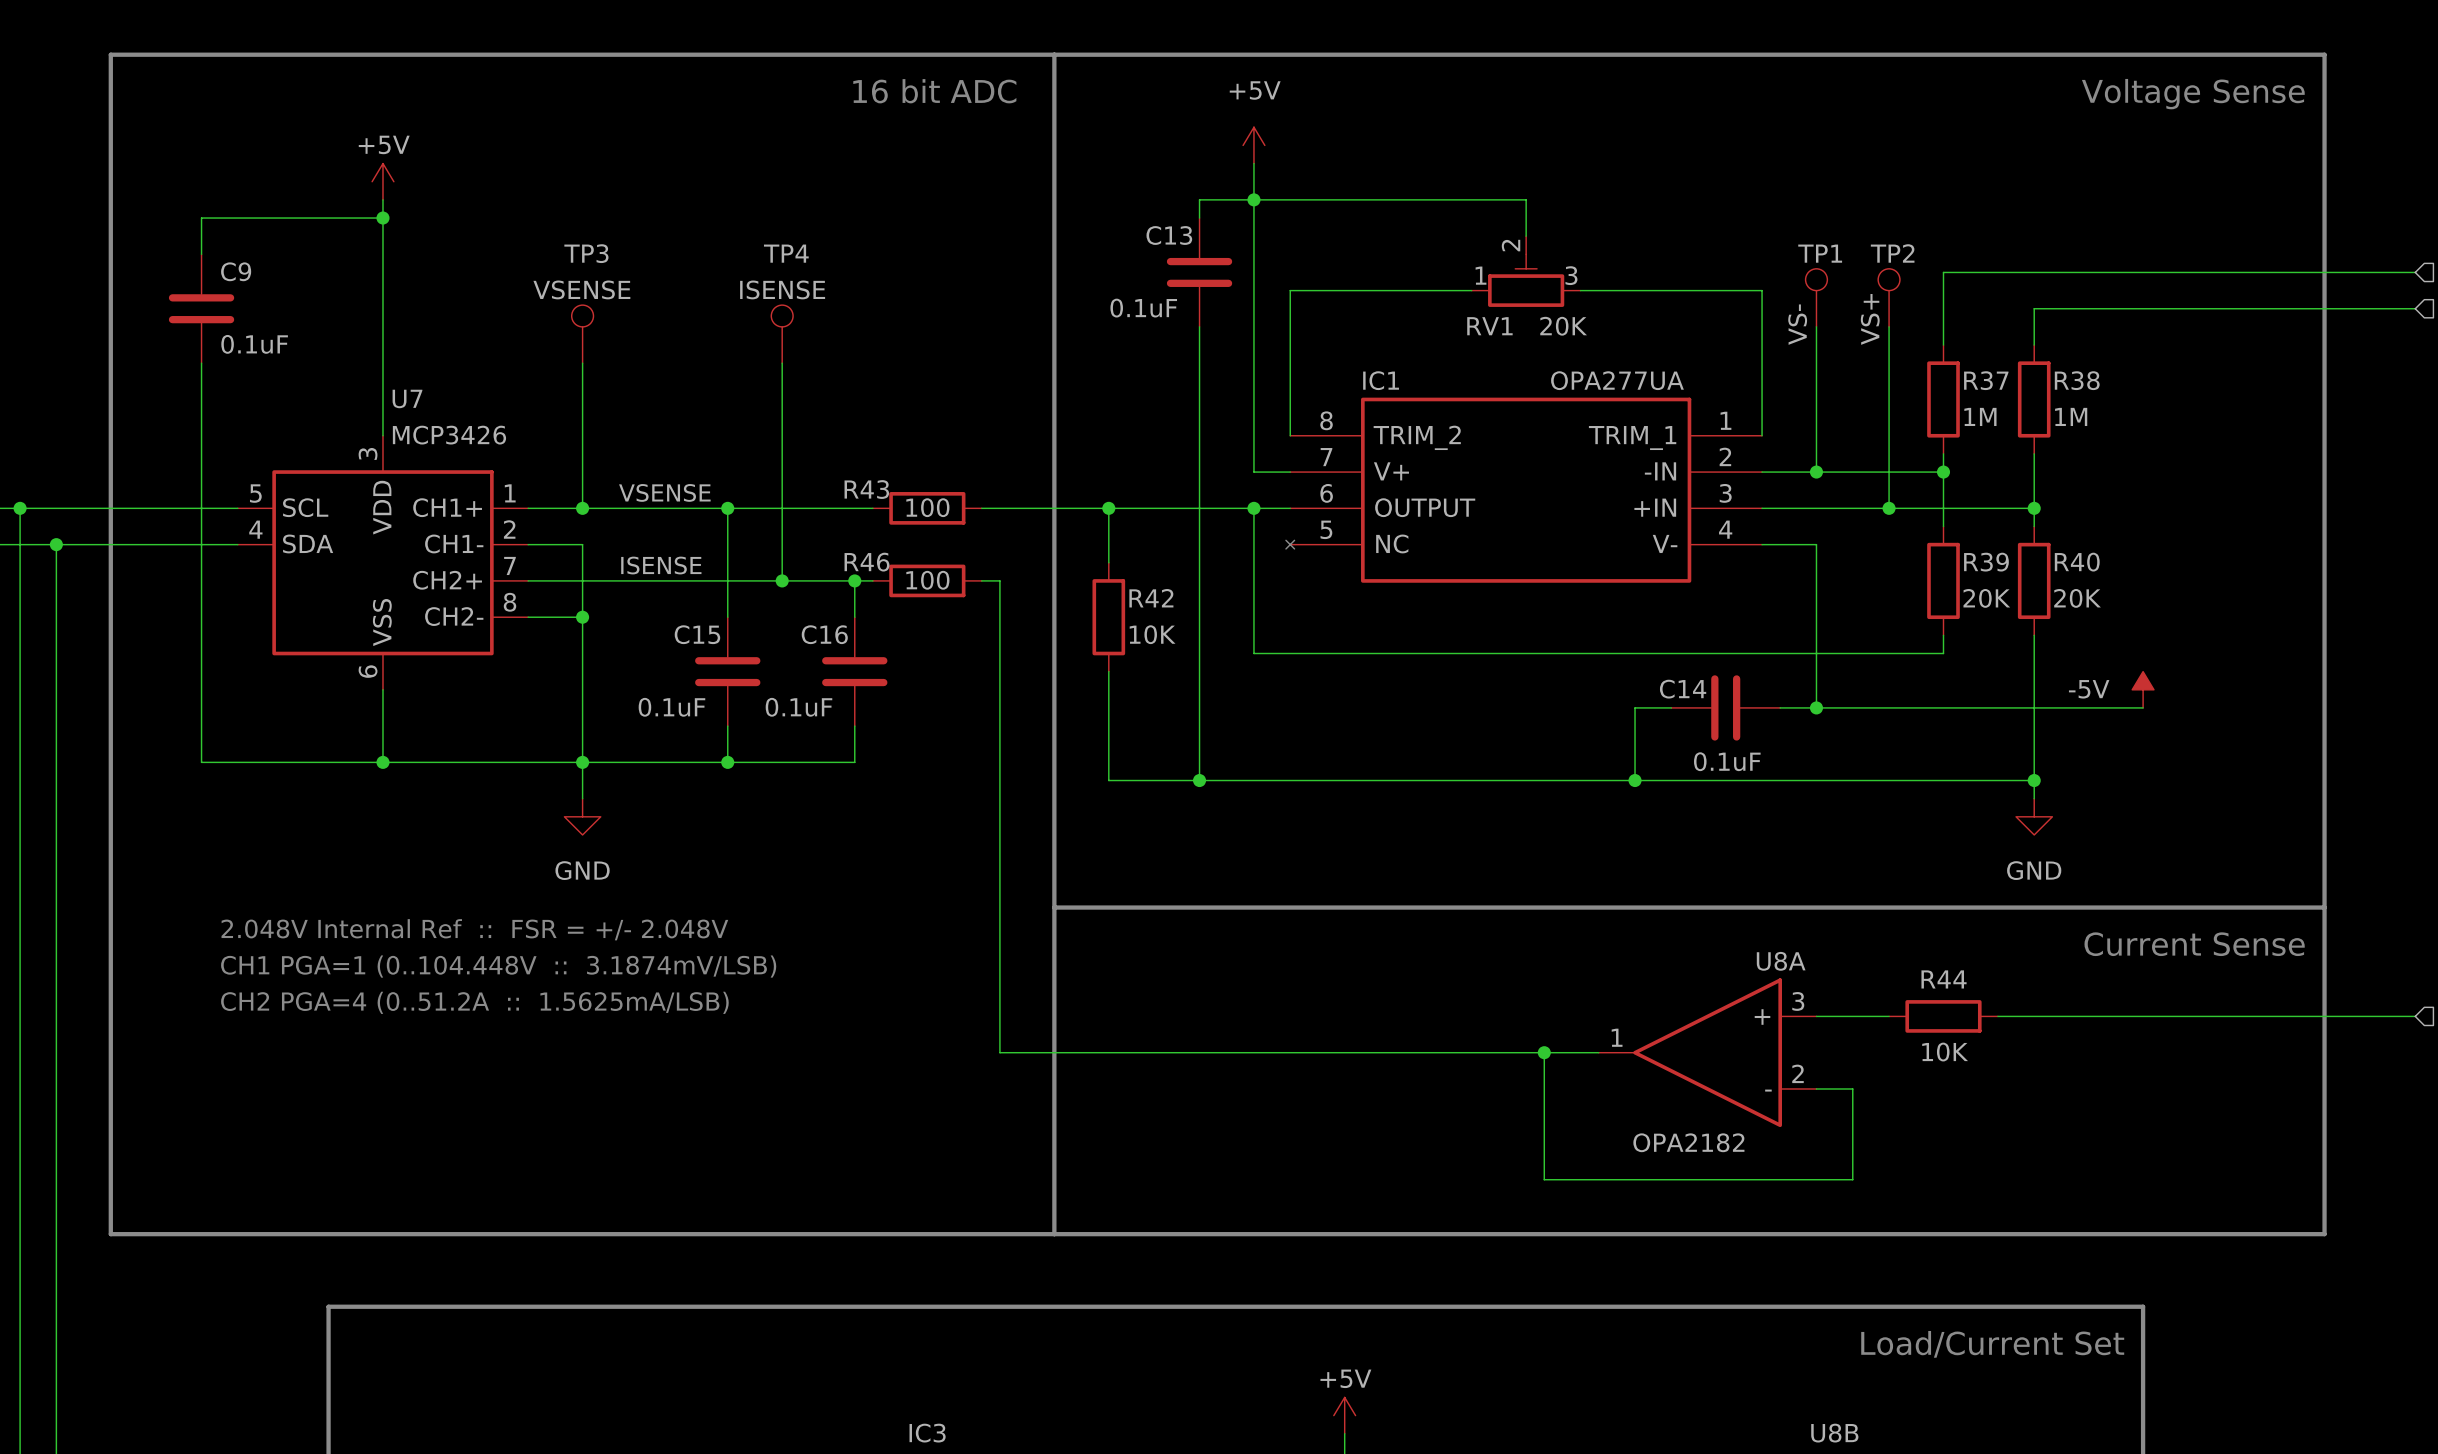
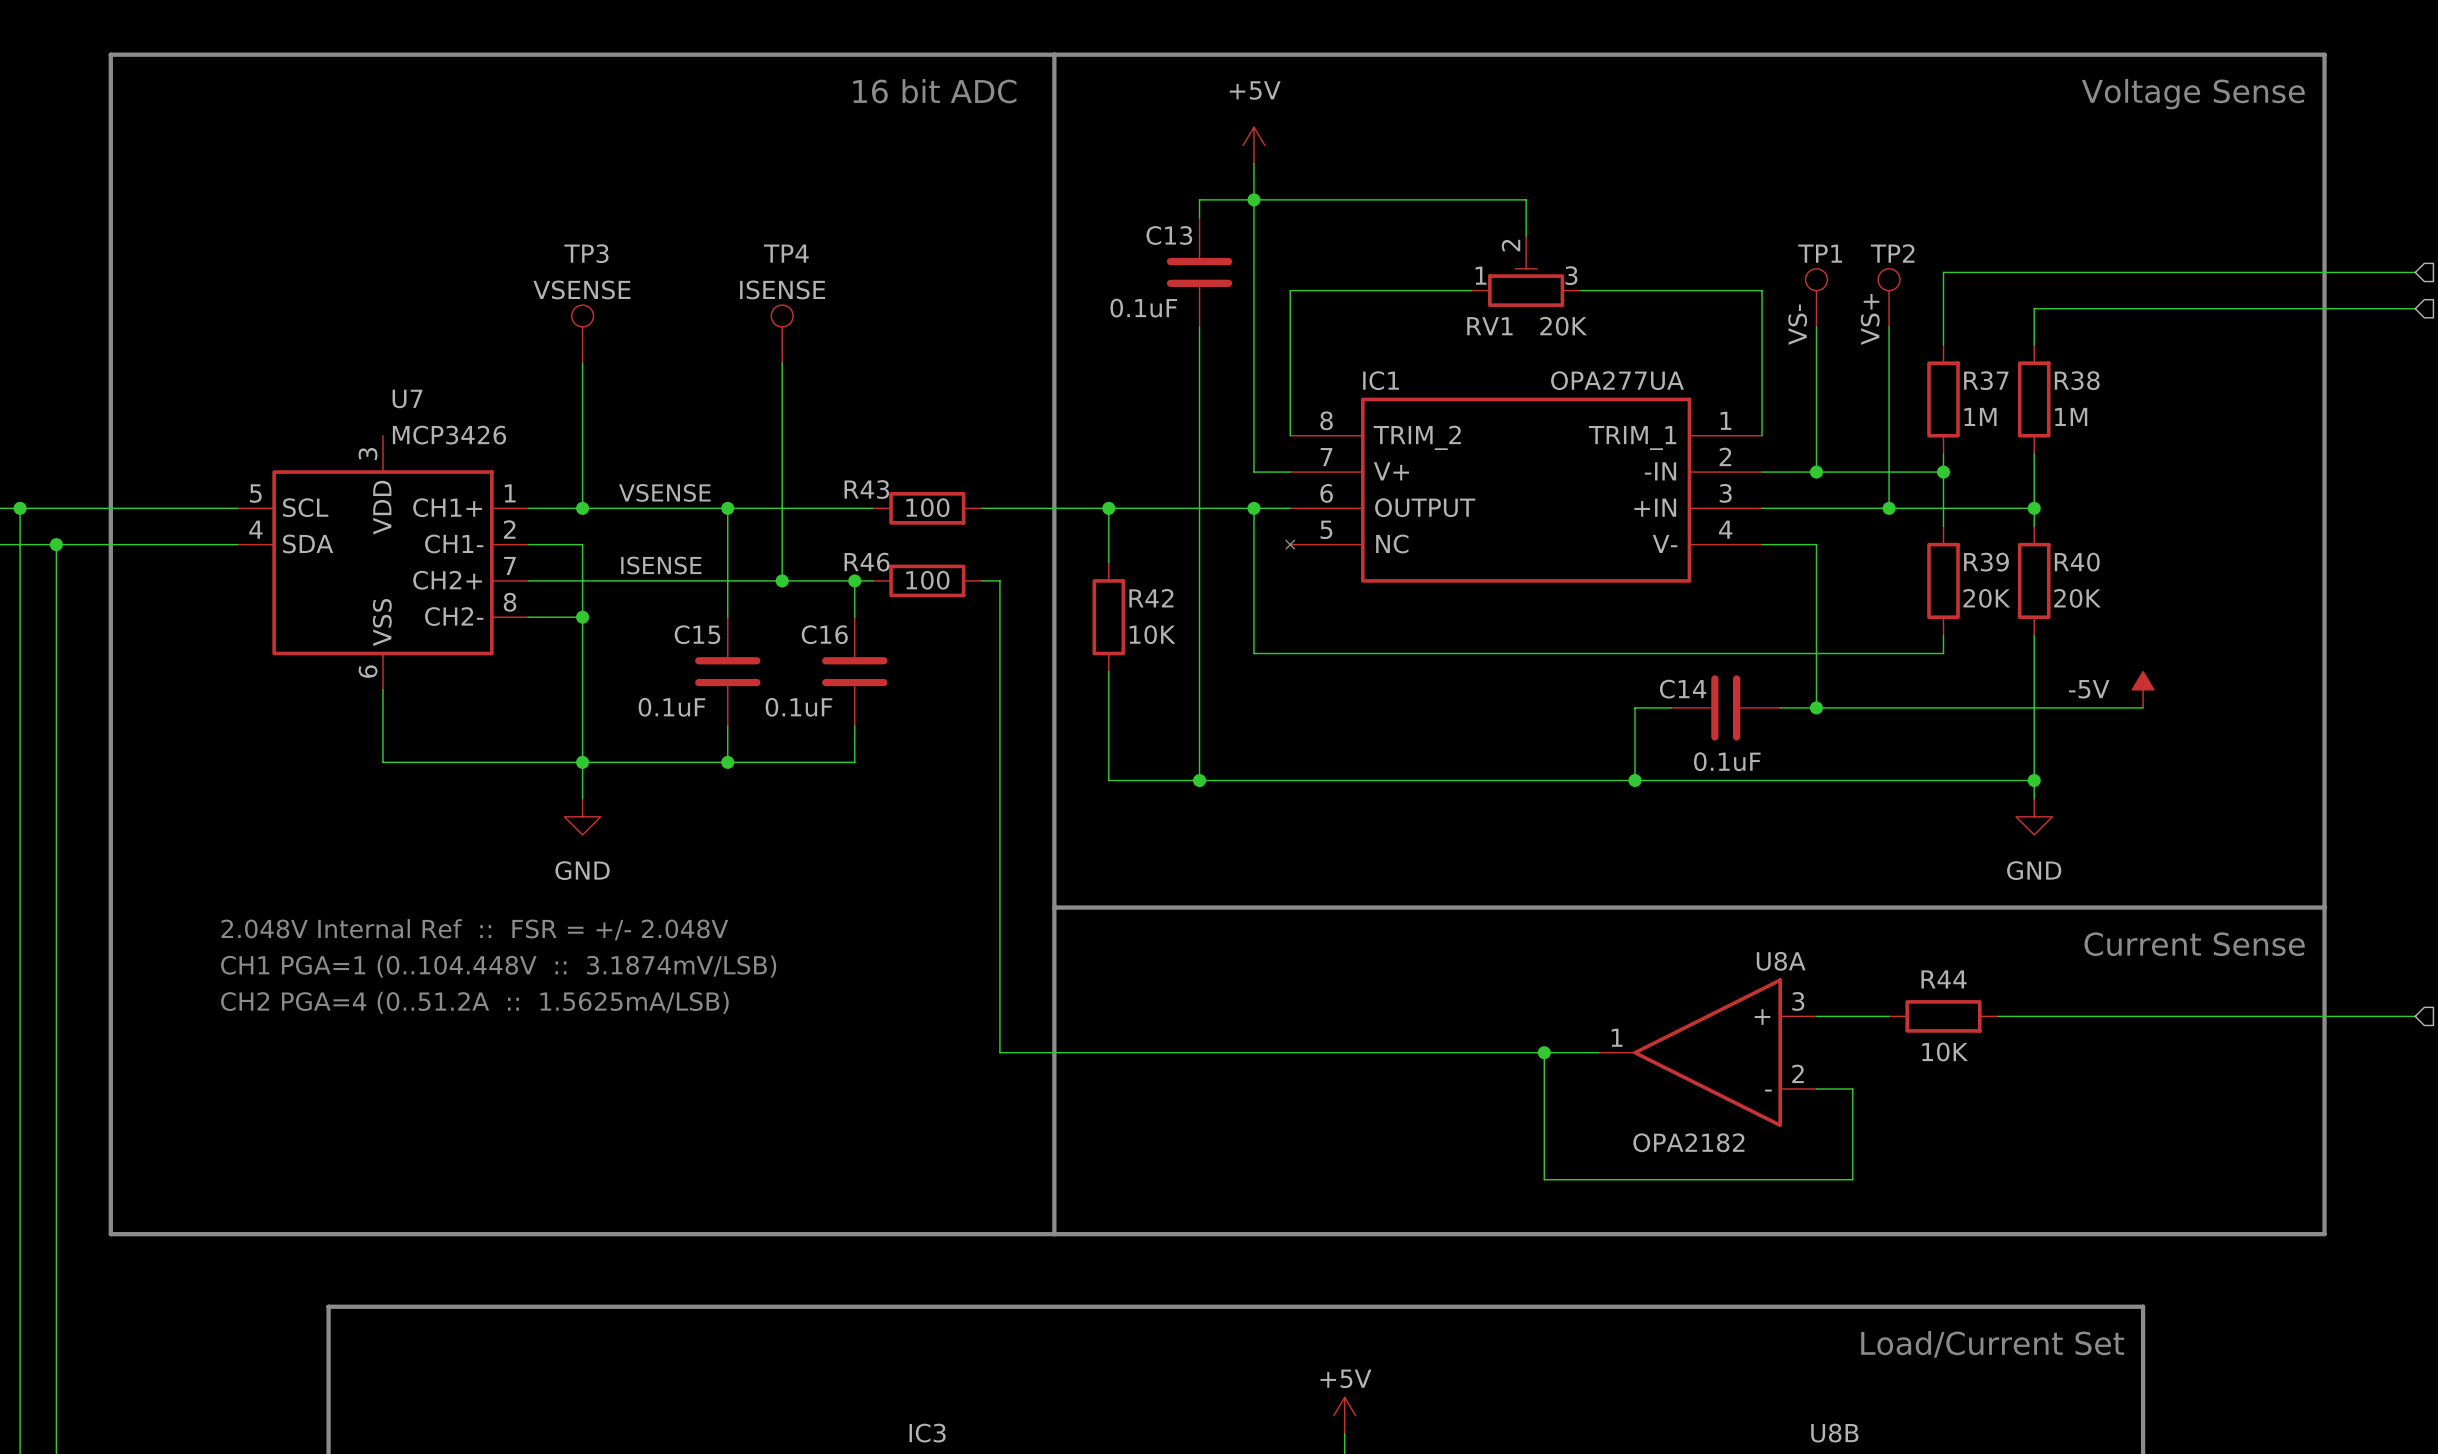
power symbol: +5V (382, 181) -> none
wire: (382, 199) (382, 435) -> none
wire: (382, 218) (201, 218) (201, 254) -> none
junction: (382, 218) -> none
C9: 0.1uF (201, 308) -> none
wire: (201, 363) (201, 762) (382, 762) -> none
junction: (382, 762) -> none

